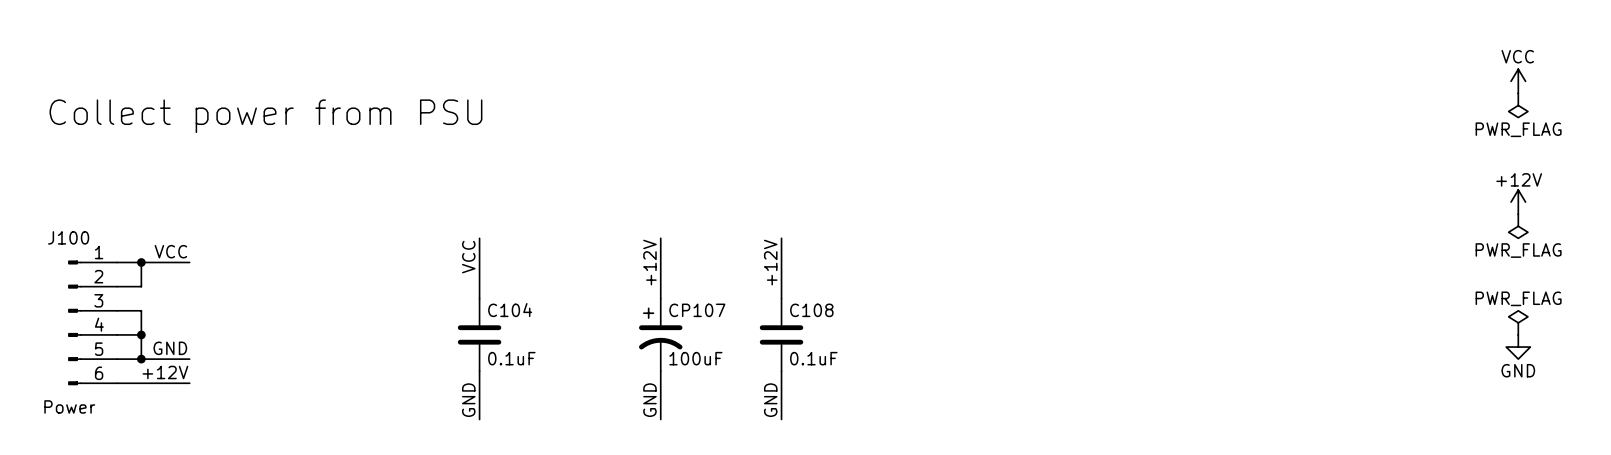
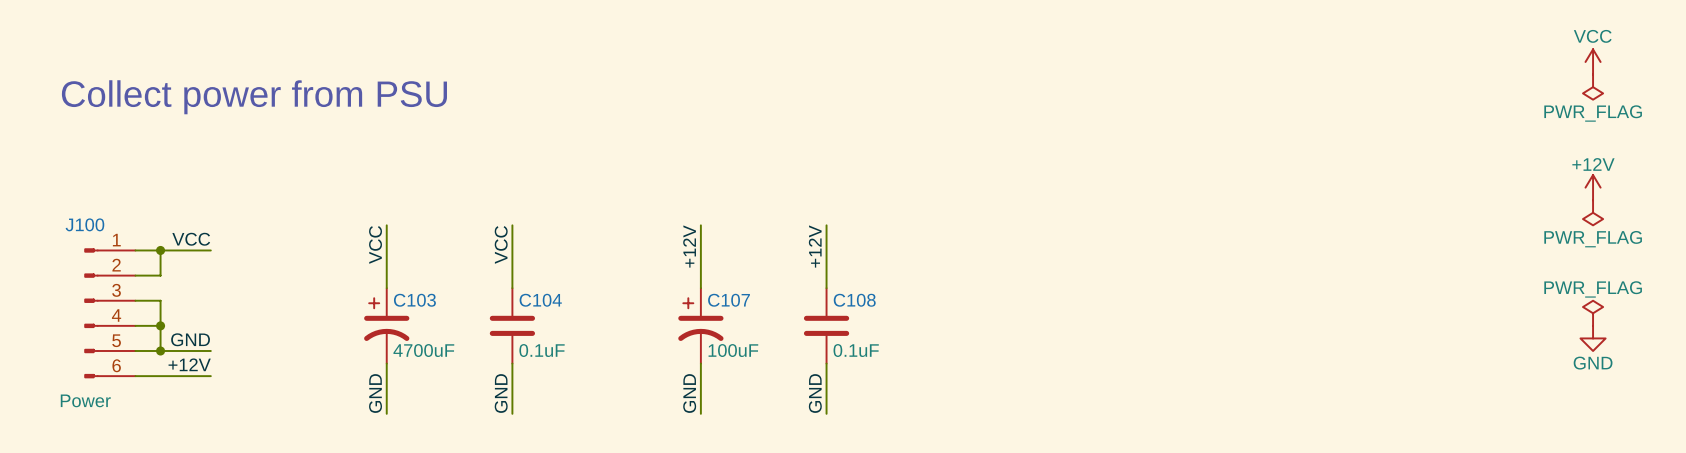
wire: none -> (386, 225) (386, 288)
label: none -> VCC (375, 244)
CP107 name: CP107 (697, 310) -> C107 (729, 300)
C103: none -> 4700uF (386, 325)
wire: none -> (386, 363) (386, 413)
label: none -> GND (375, 393)

